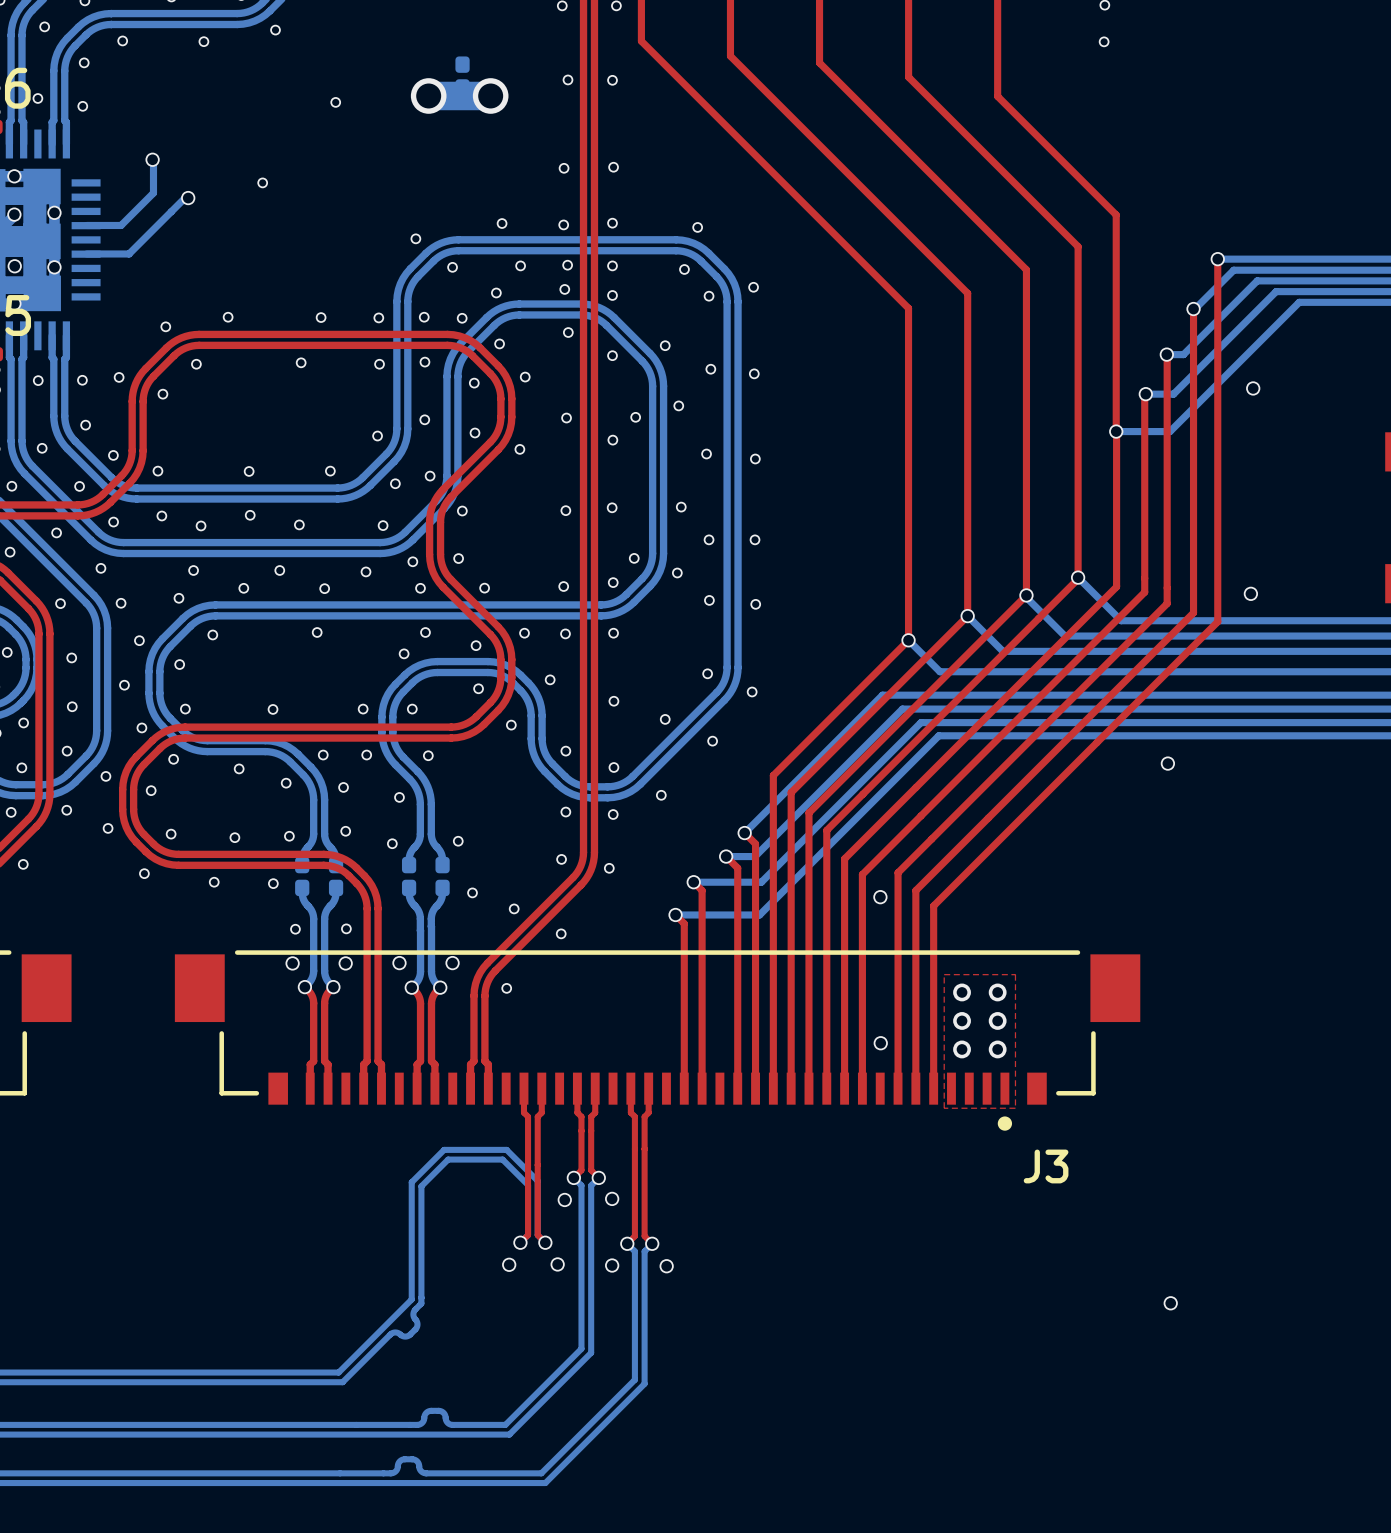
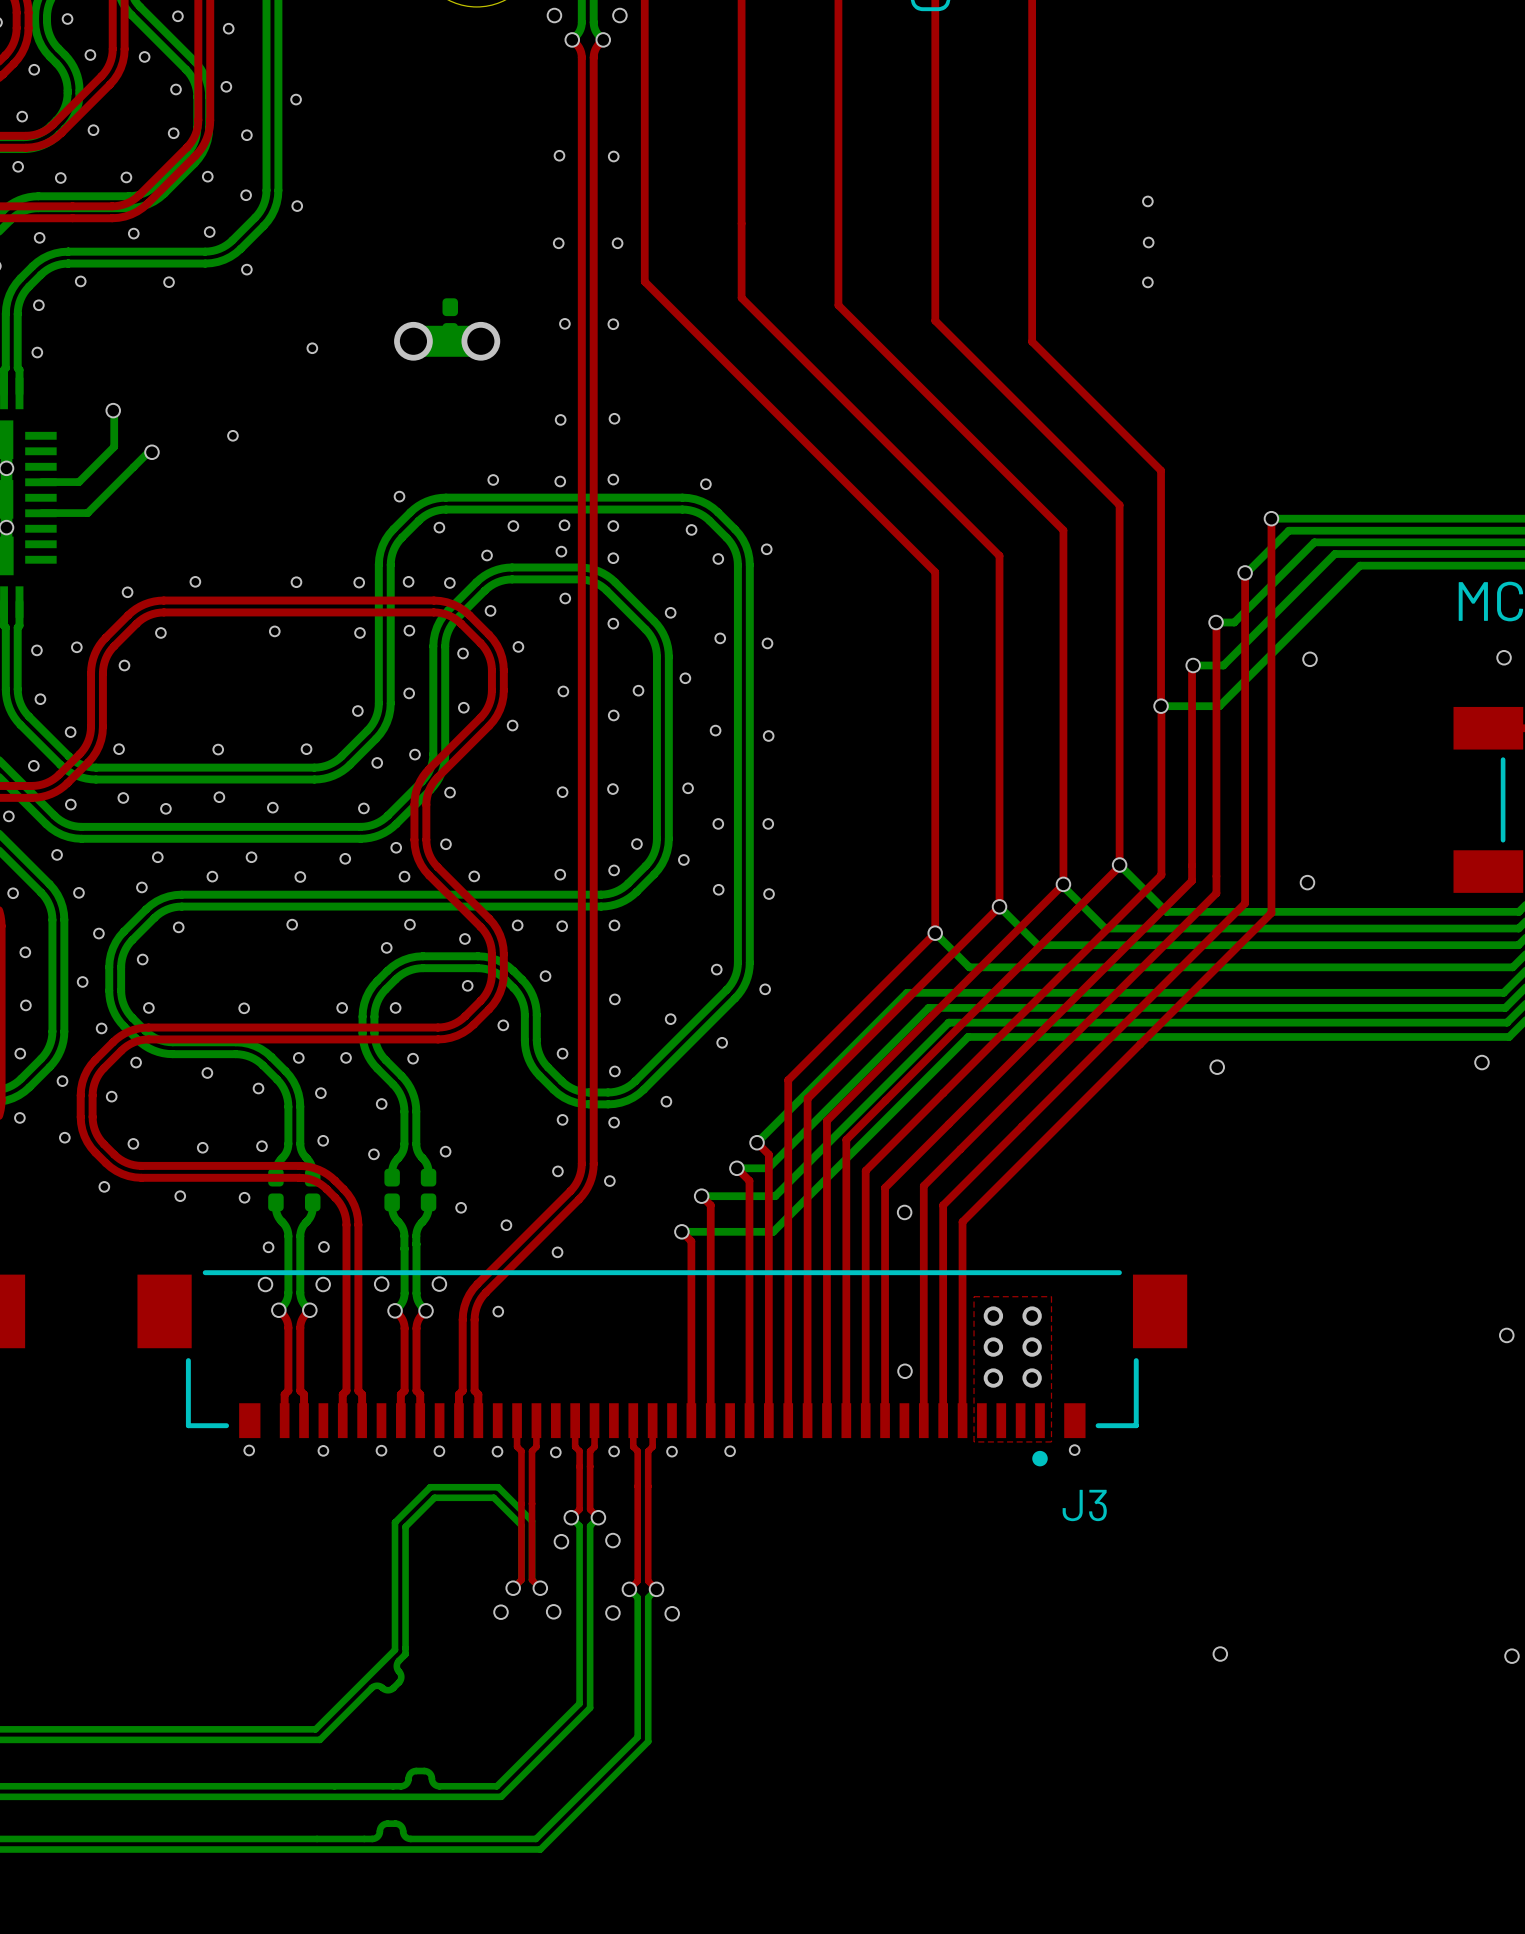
via: none -> (1074, 1450)
via: none -> (249, 1450)
via: none -> (323, 1450)
via: none -> (381, 1450)
via: none -> (439, 1451)
via: none -> (614, 1451)
via: none -> (730, 1451)
via: none -> (497, 1451)
via: none -> (555, 1452)
via: none -> (672, 1451)

